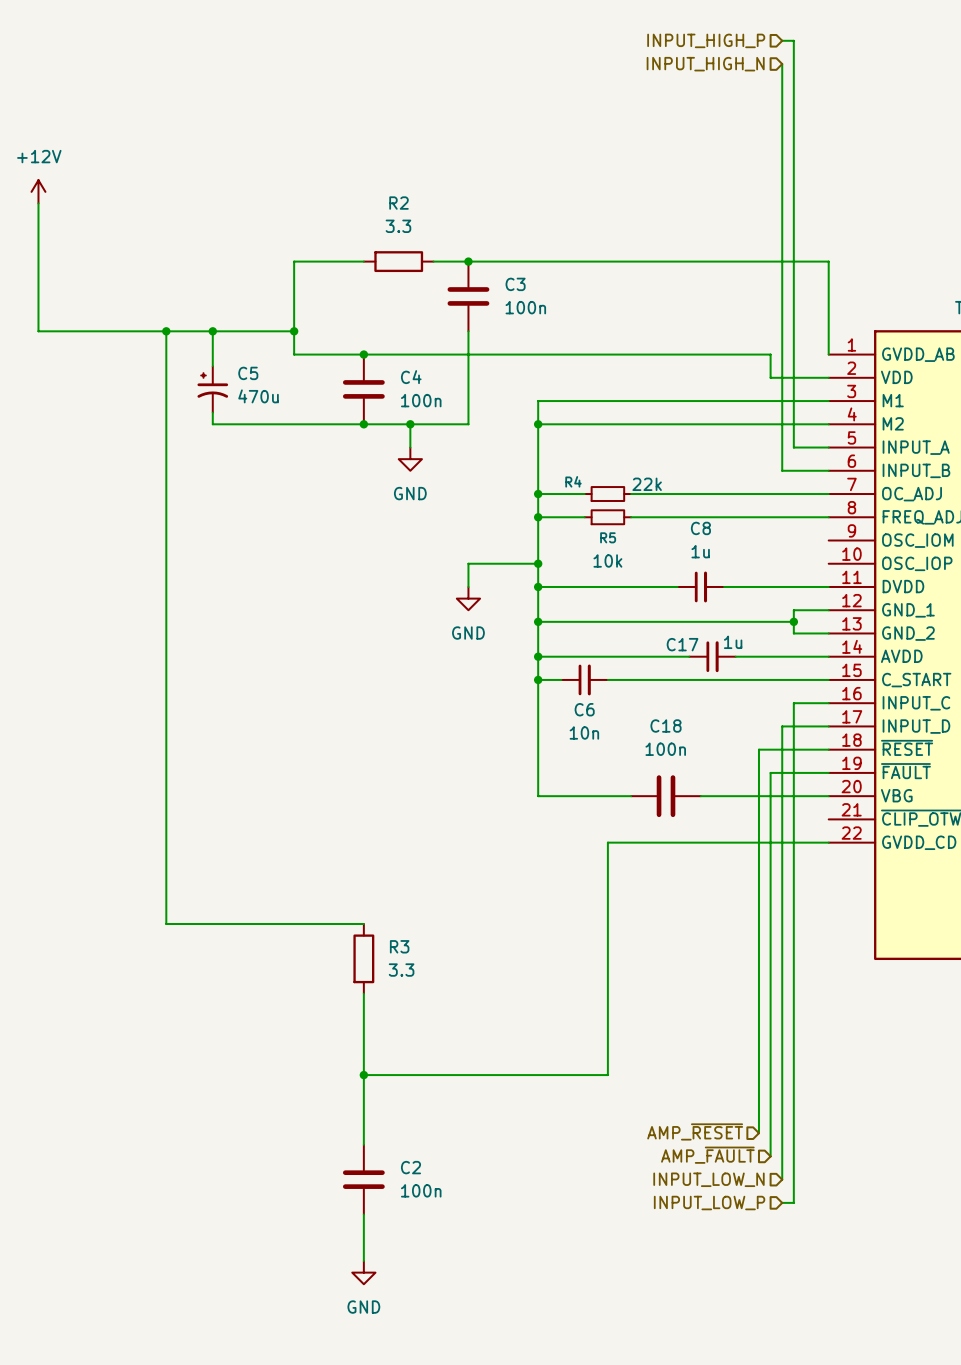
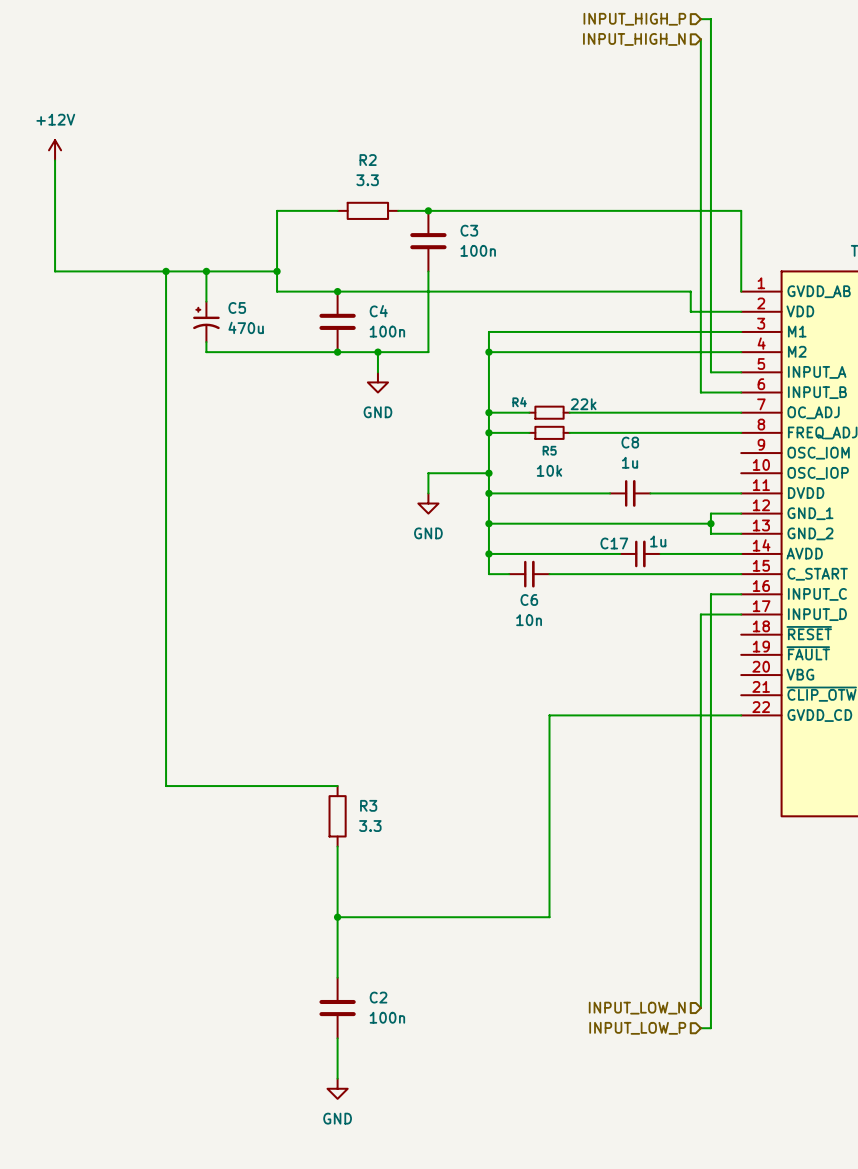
wire: (538, 679) (538, 796) (631, 796) -> none
junction: (538, 679) -> none
wire: (828, 749) (758, 749) (758, 1133) -> none
wire: (828, 772) (770, 772) (770, 1156) -> none
C18: 100n (666, 796) -> none
wire: (700, 796) (828, 796) -> none
hierarchical label: AMP_~{RESET} (695, 1131) -> none
hierarchical label: AMP_~{FAULT} (707, 1155) -> none

